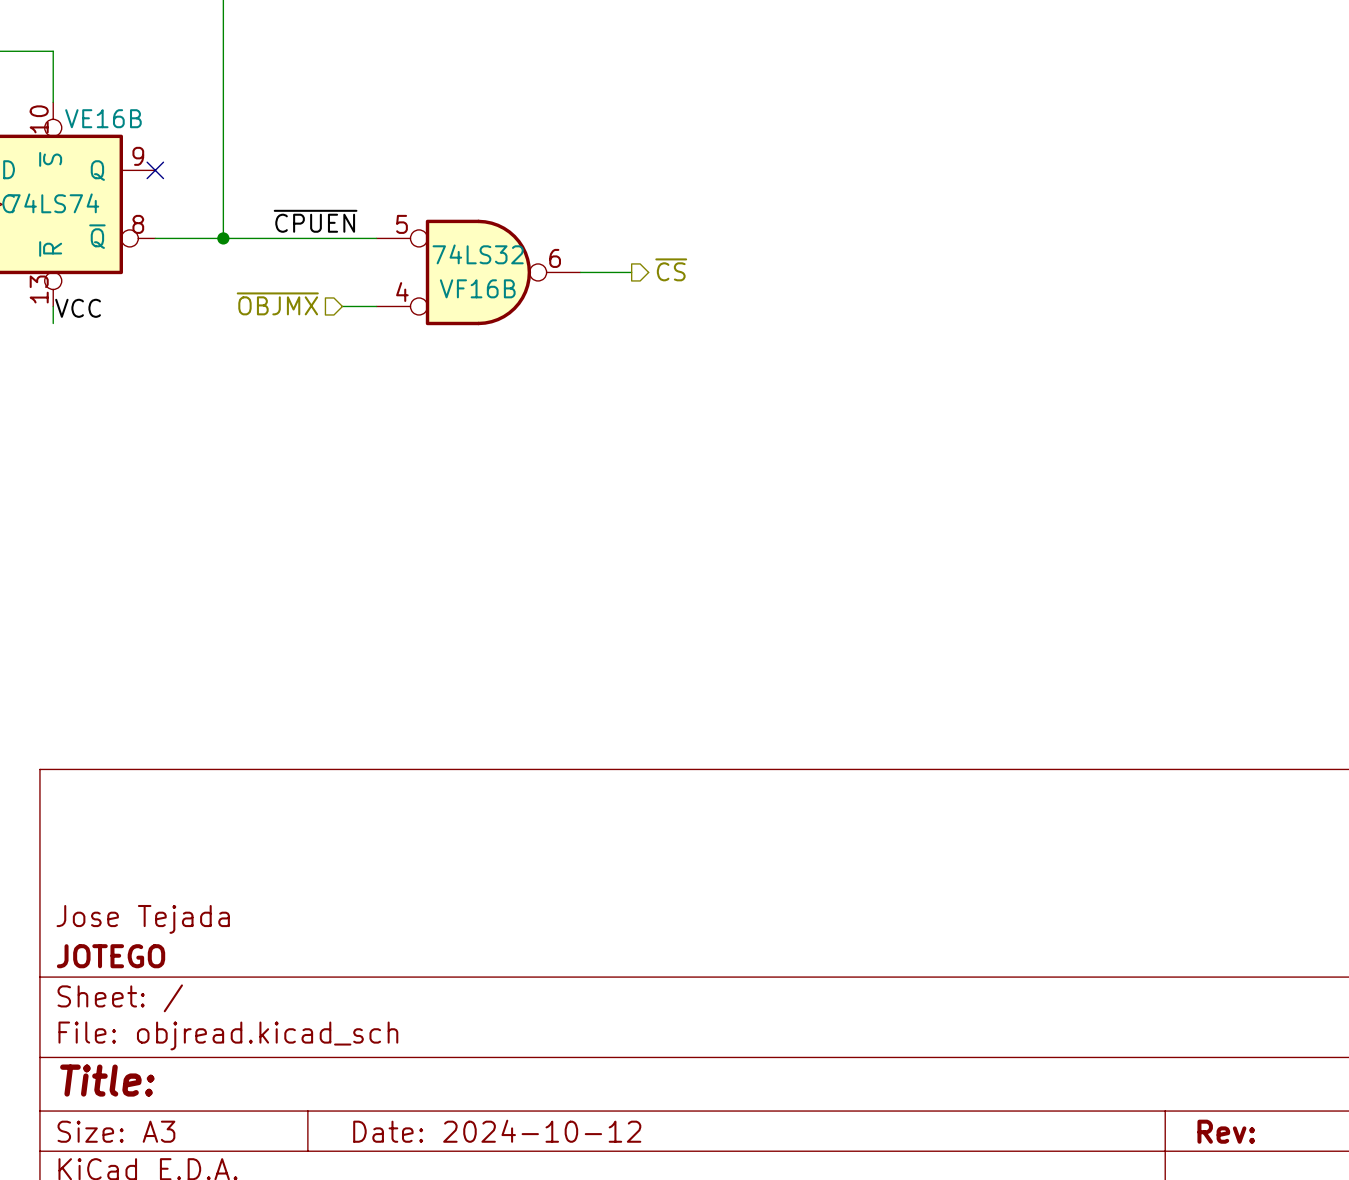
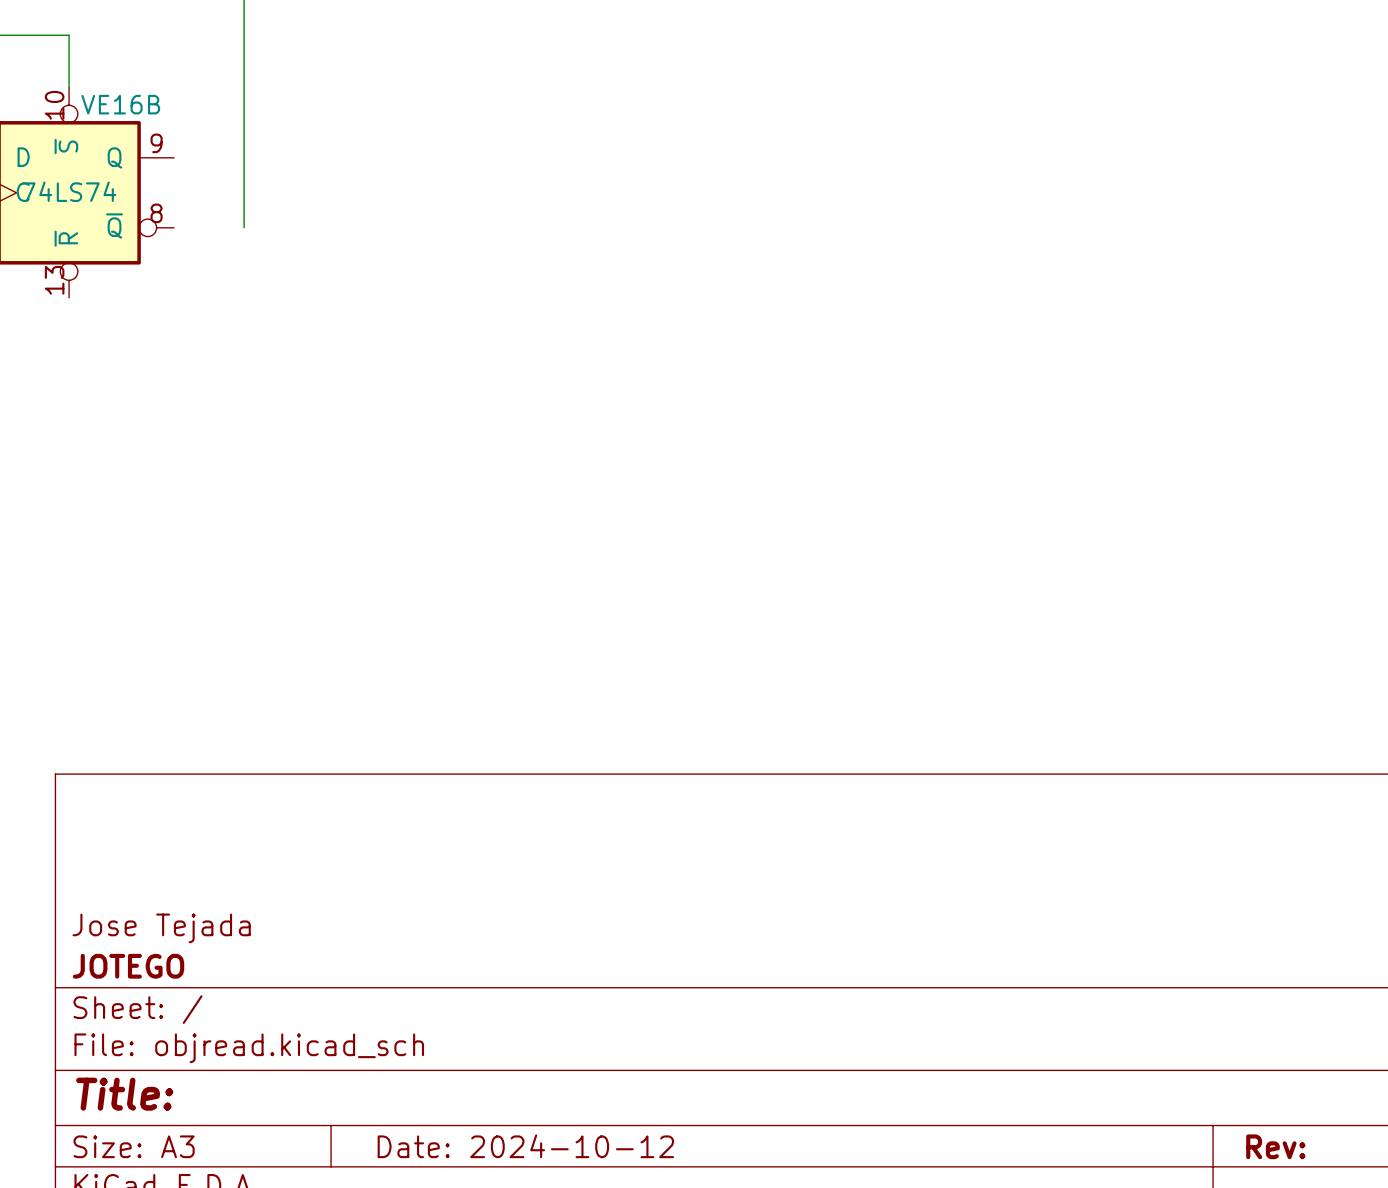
no-connect mark: (155, 170) -> none
label: ~{CPUEN} (315, 221) -> none
wire: (155, 238) (376, 238) -> none
junction: (223, 238) -> none
hierarchical label: ~{CS} (671, 269) -> none
VF16B: 74LS32 (478, 272) -> none
wire: (580, 272) (631, 272) -> none
hierarchical label: ~{OBJMX} (277, 303) -> none
wire: (53, 306) (53, 323) -> none
wire: (342, 306) (376, 306) -> none
label: VCC (78, 308) -> none

